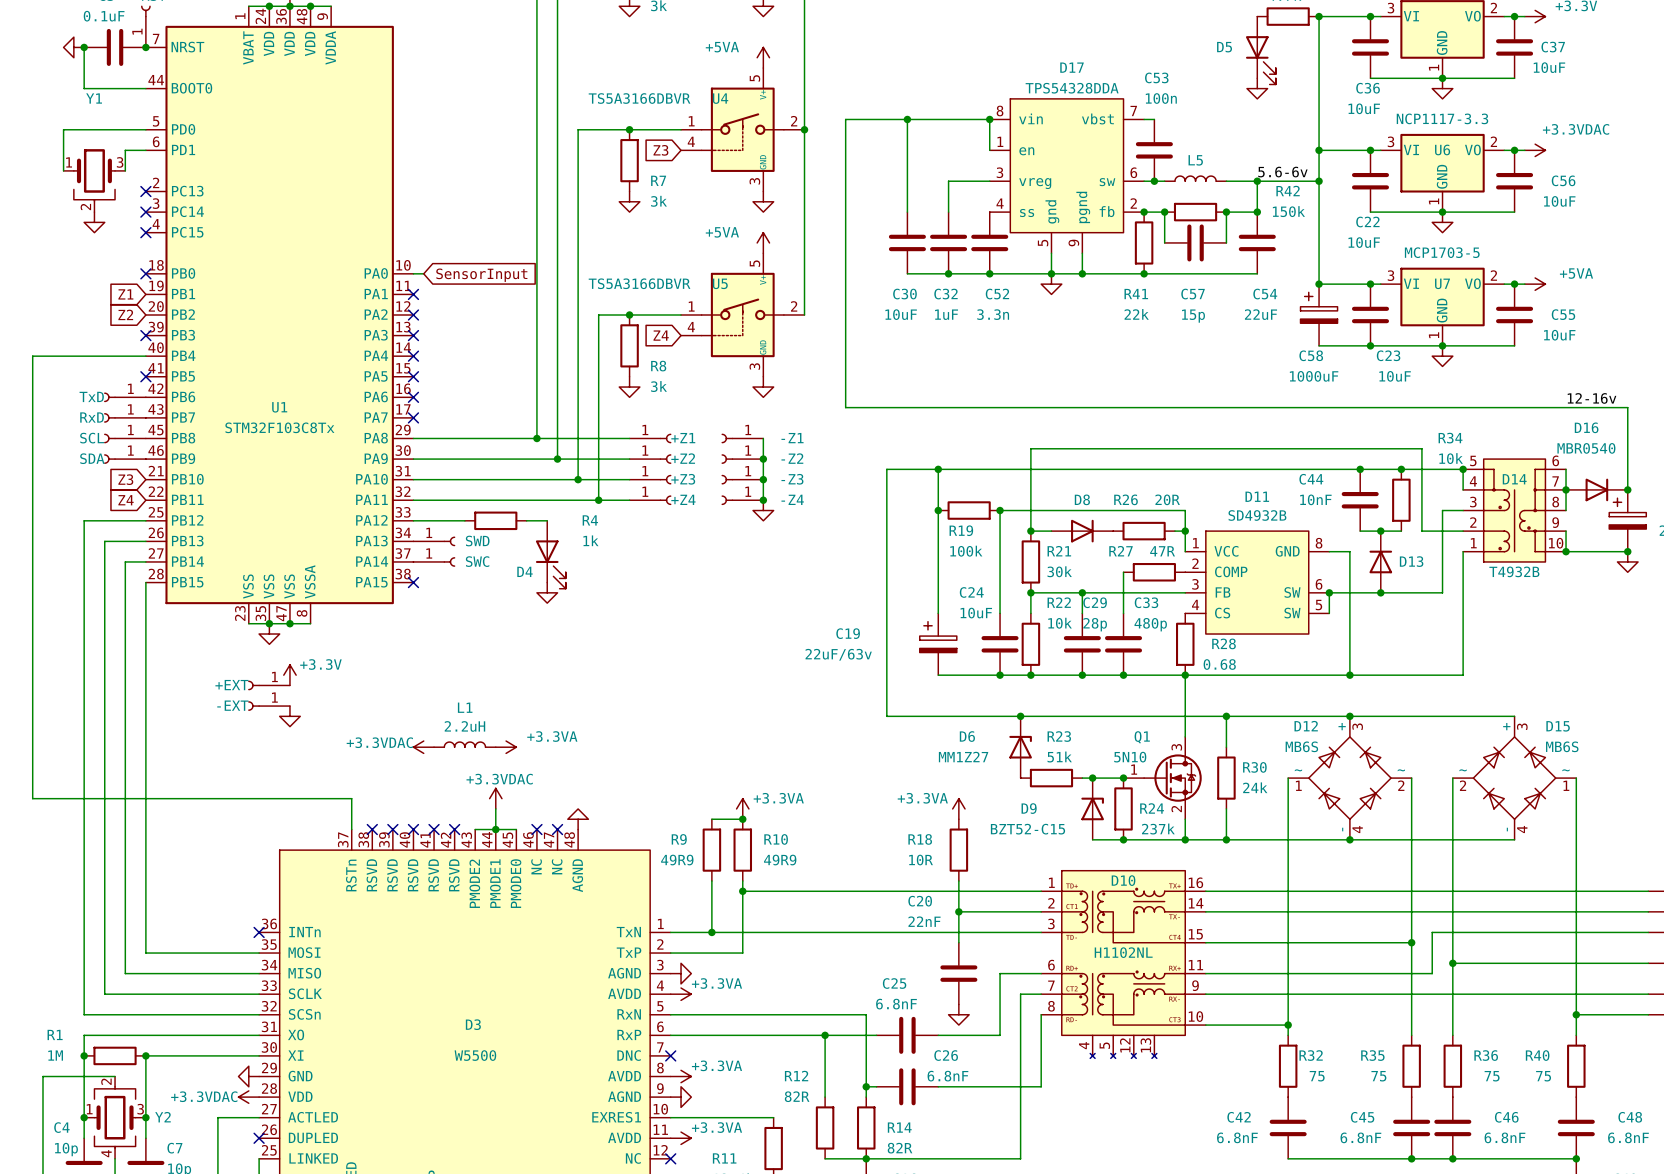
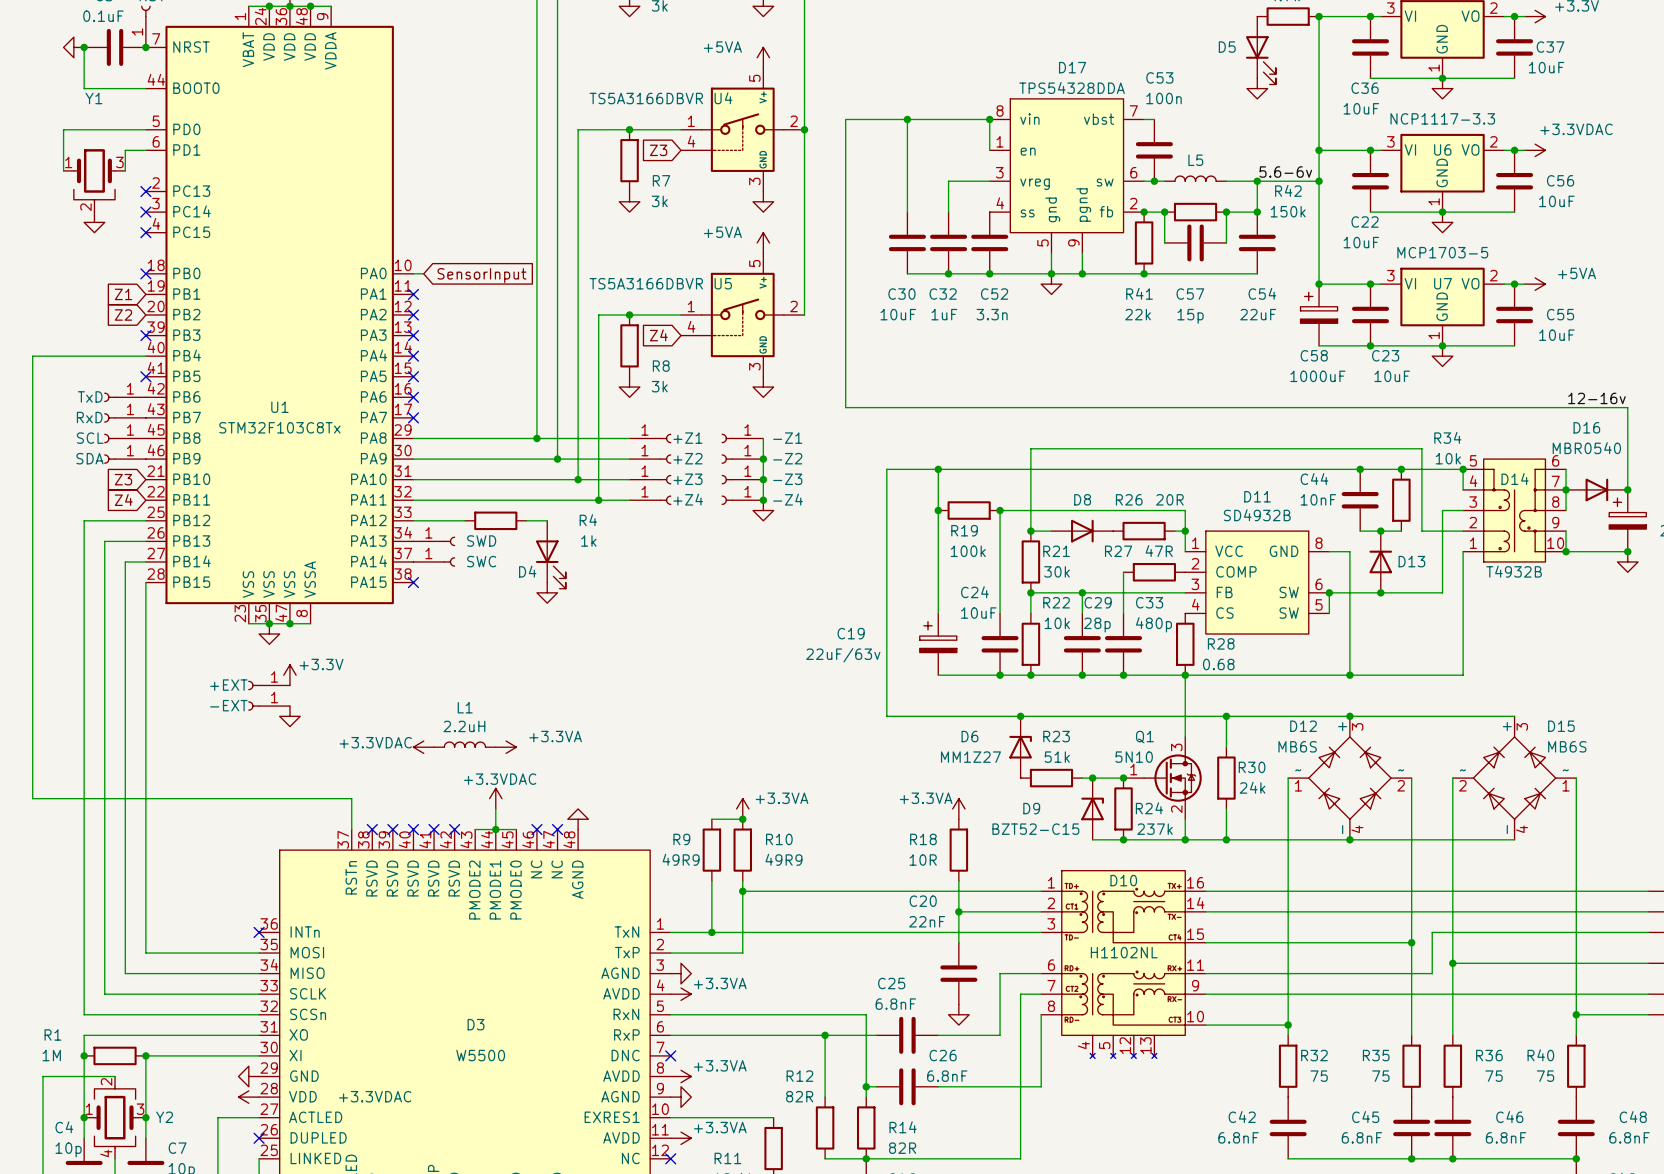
power symbol text position: +3.3VDAC (204, 1096) -> +3.3VDAC (375, 1096)

